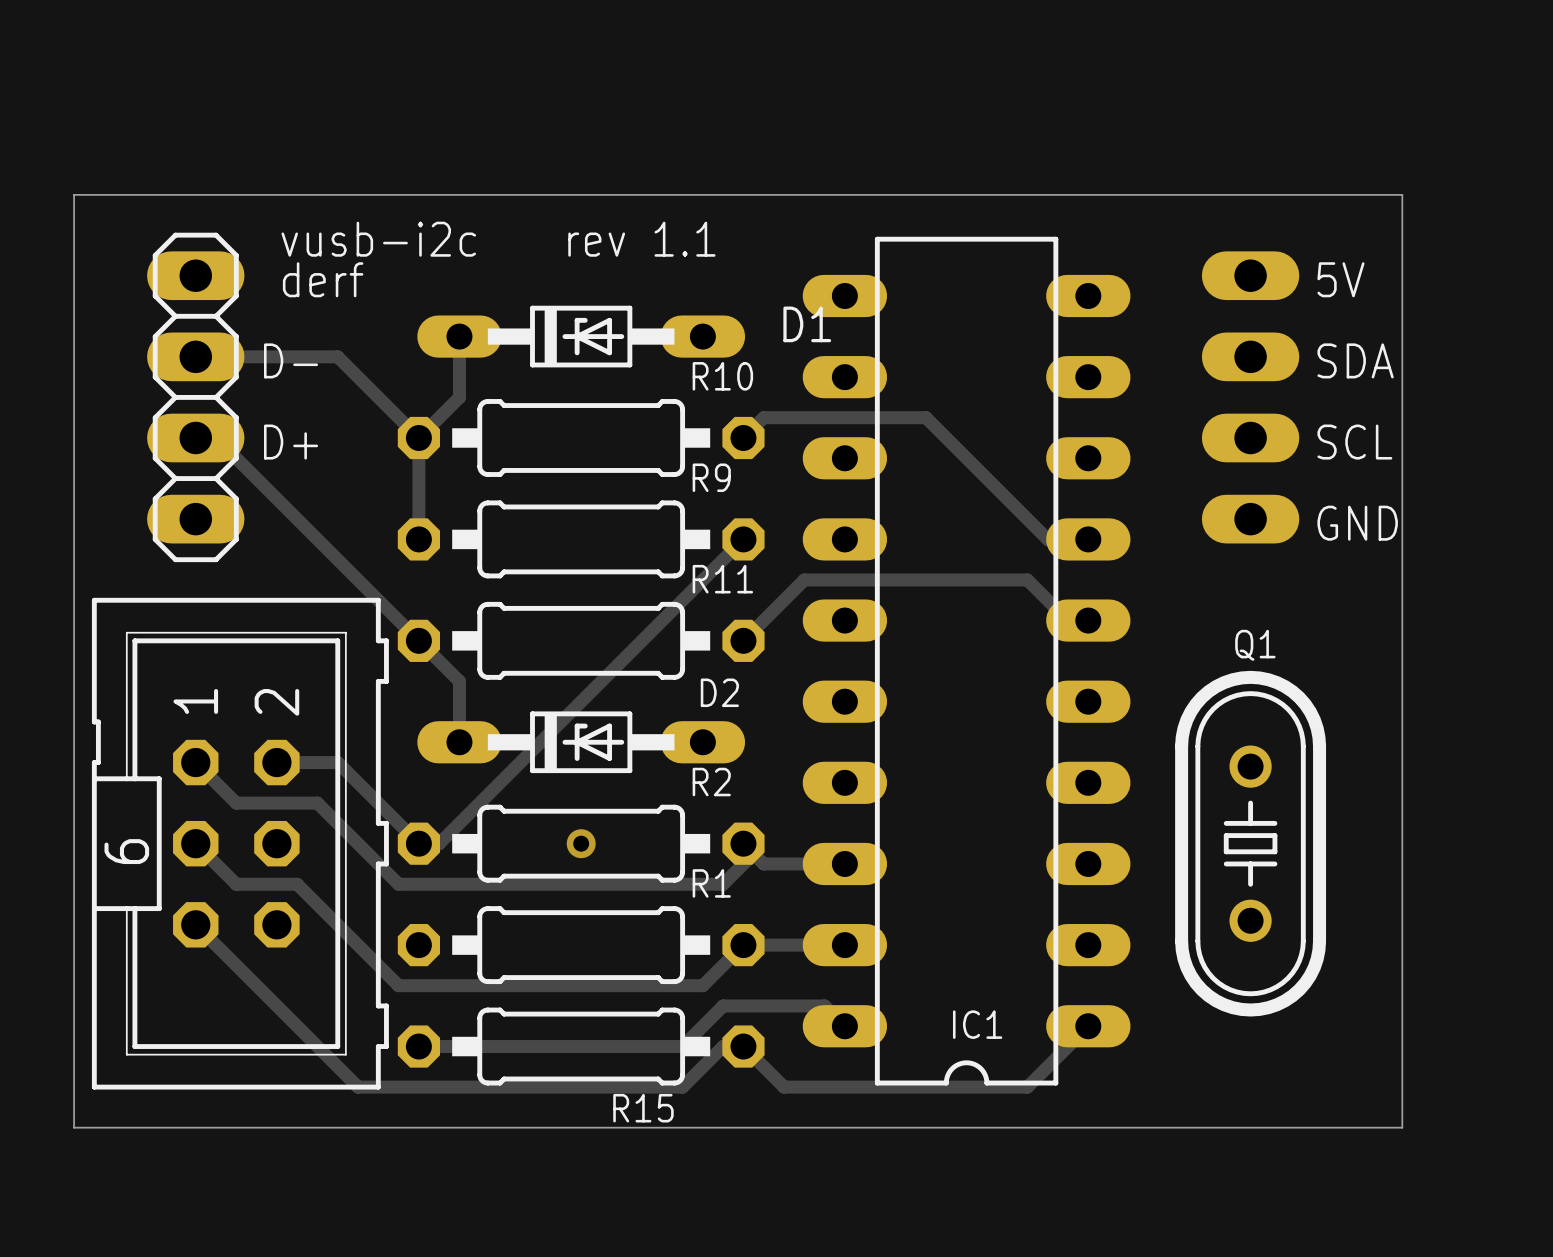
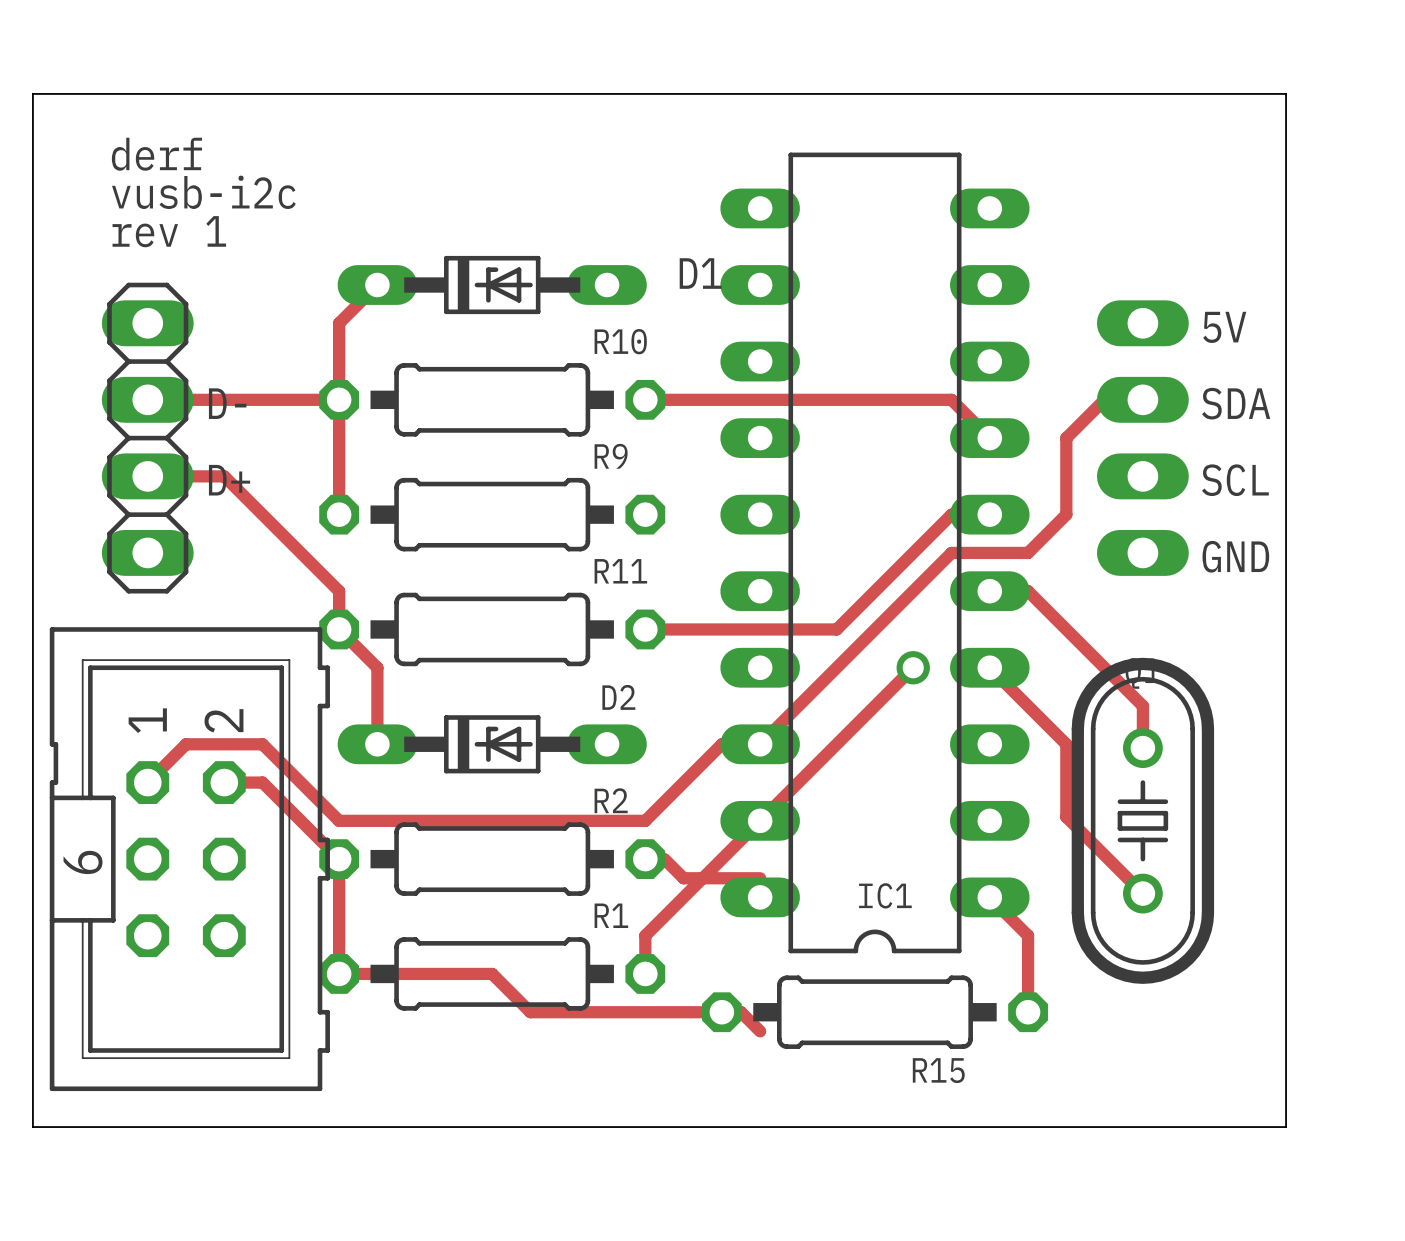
text: none -> rev 1 (169, 231)
board edge: (74, 194) (1402, 194) -> (32, 247) (32, 93) (1286, 93) (1286, 247)
track: none -> (377, 285) (339, 323) (339, 514)
text position: vusb-i2c (378, 239) -> vusb-i2c (203, 192)
text: rev 1.1 (641, 239) -> none
text position: derf (323, 279) -> derf (156, 154)
track: (459, 336) (459, 397) (418, 437) -> none
D1 position: (581, 336) -> (492, 285)
track: (337, 356) (418, 437) -> (281, 399) (339, 399)
track: none -> (645, 399) (951, 399) (989, 438)
track: (216, 437) (459, 681) (459, 742) -> (166, 476) (224, 476) (339, 591) (339, 629) (377, 667) (377, 744)
track: (418, 437) (418, 539) -> none
R10 position: (581, 437) -> (492, 399)
track: (743, 437) (763, 417) (926, 417) (1047, 539) (1088, 539) -> none
track: none -> (989, 514) (951, 514) (836, 629) (645, 629)
R9 position: (581, 539) -> (492, 514)
track: (743, 539) (439, 843) (418, 843) (337, 762) (317, 762) -> none
track: none -> (989, 591) (1028, 591) (1142, 706) (1142, 748)
track: (1088, 620) (1068, 620) (1027, 579) (804, 579) (743, 640) -> none
R11 position: (581, 640) -> (492, 629)
track: none -> (913, 667) (645, 935) (645, 973)
via: none -> (913, 667)
track: none -> (989, 667) (1066, 744) (1066, 817) (1142, 893)
IC1 position: (966, 661) -> (874, 552)
D2 position: (581, 742) -> (492, 744)
track: (195, 762) (236, 803) (317, 803) (398, 884) (723, 884) (753, 853) -> (147, 782) (186, 744) (262, 744) (339, 820) (645, 820) (721, 744) (760, 744) (951, 552) (1028, 552) (1066, 514) (1066, 438) (1104, 399) (1142, 399)
track: (195, 843) (236, 884) (297, 884) (398, 985) (702, 985) (743, 945) (844, 945) -> none
R2 position: (581, 843) -> (492, 859)
via: (581, 843) -> none
Q1 position: (1250, 843) -> (1142, 820)
track: none -> (989, 897) (1028, 935) (1028, 1012)
track: (195, 924) (358, 1087) (682, 1087) (723, 1046) (743, 1046) (784, 1087) (1027, 1087) (1088, 1026) -> none
R1 position: (581, 945) -> (492, 973)
track: (723, 1005) (682, 1046) (418, 1046) -> (645, 1012) (530, 1012) (492, 973) (339, 973) (339, 859) (262, 782)
R15 position: (581, 1046) -> (874, 1012)

